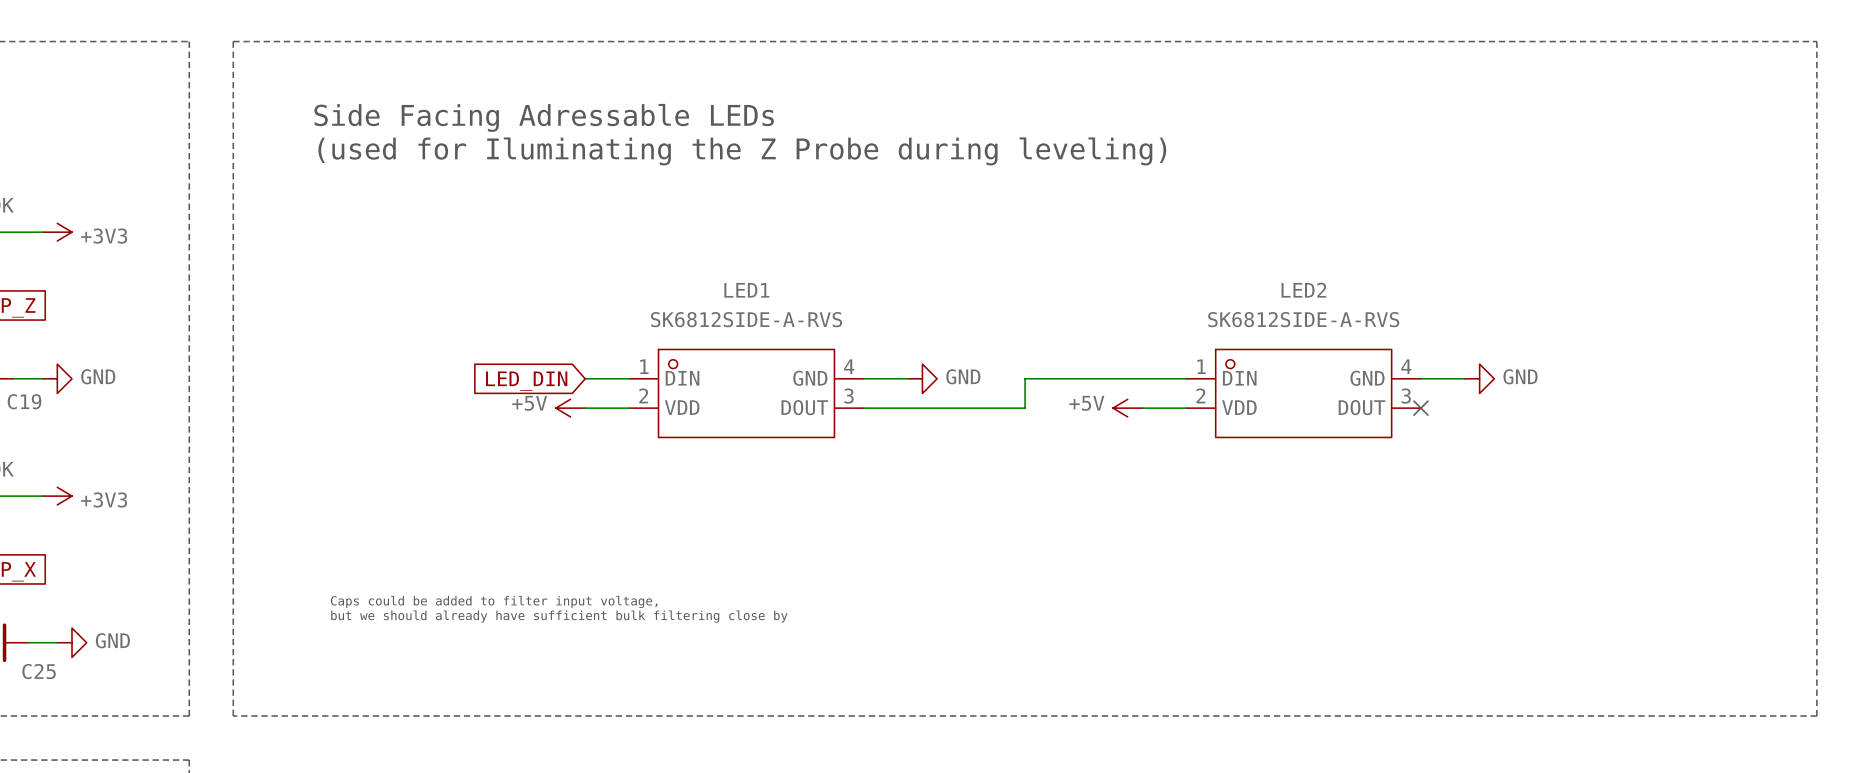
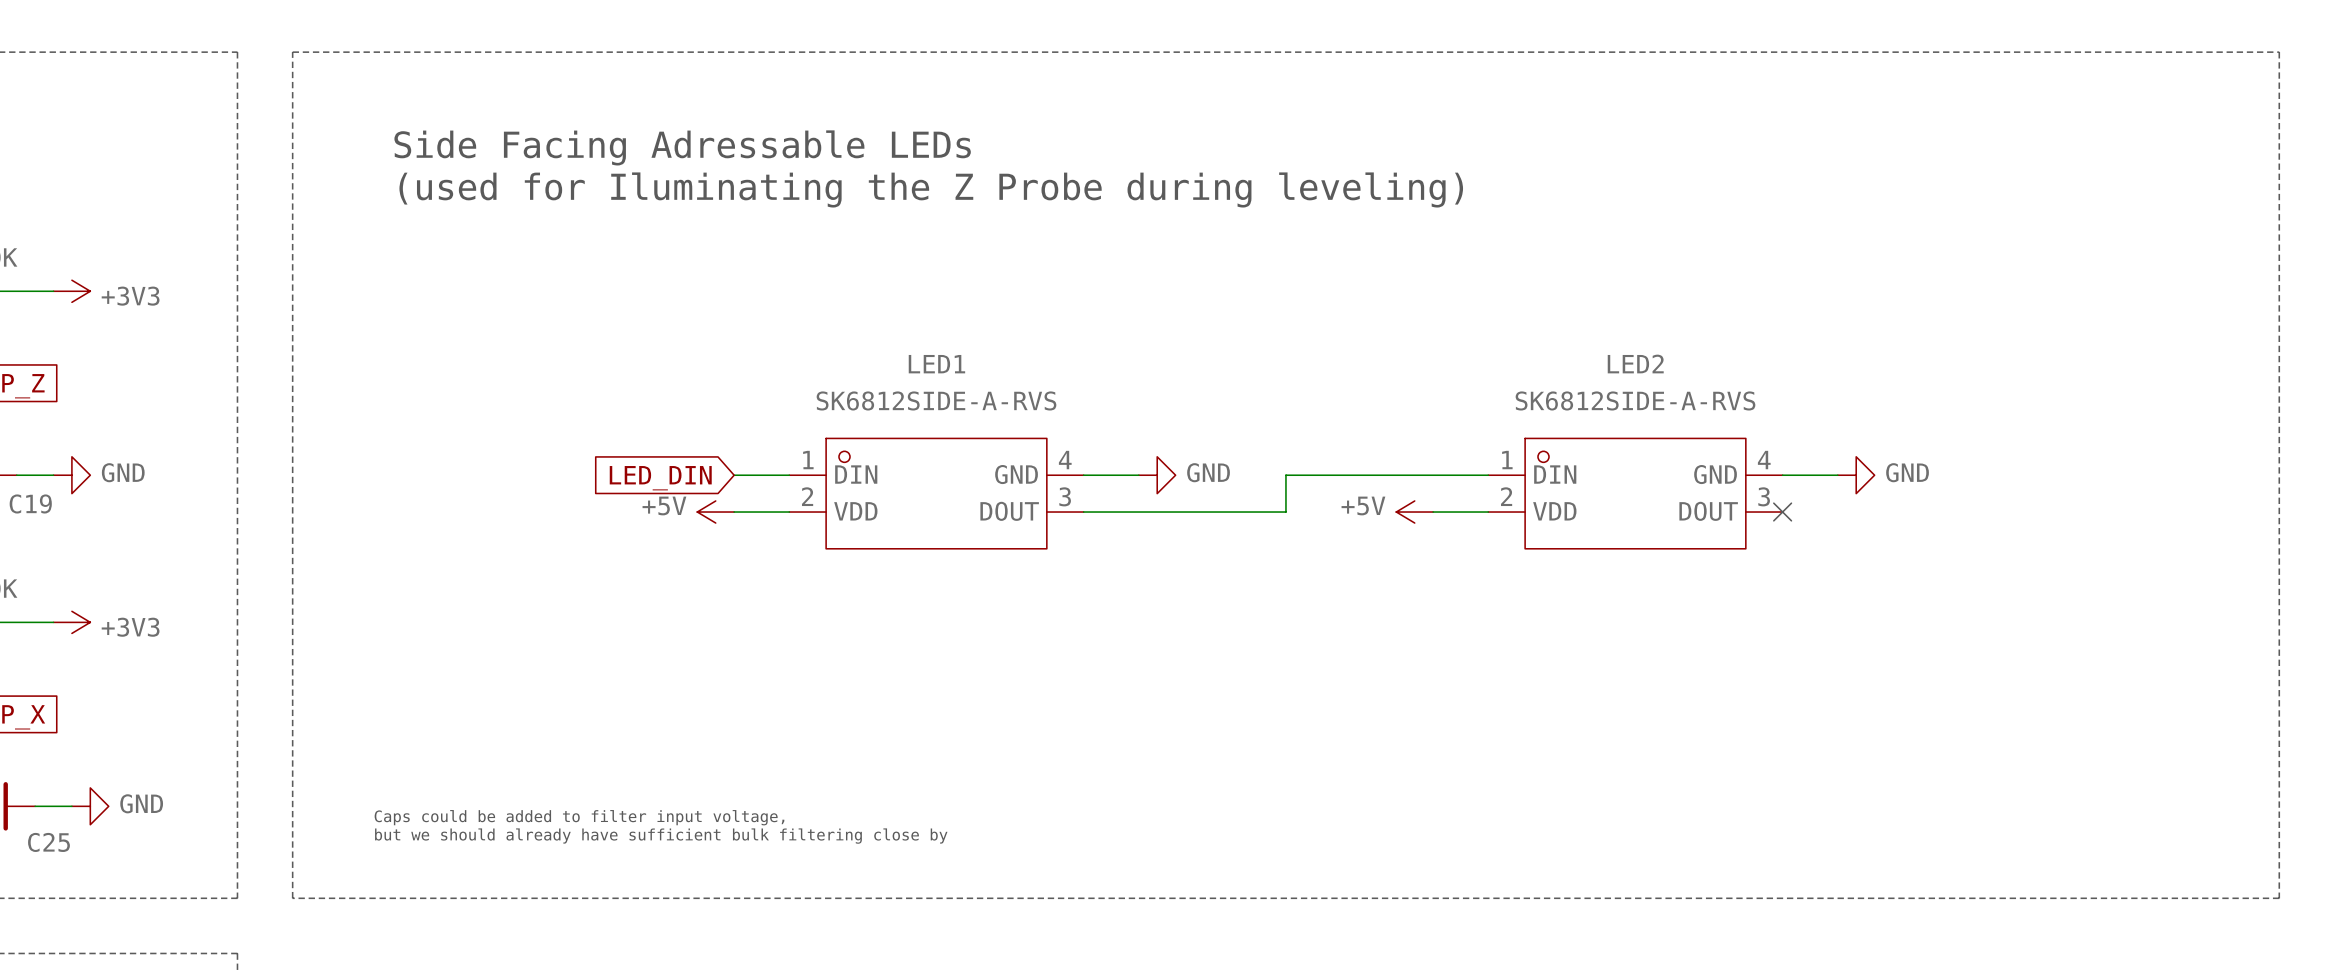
text position: Caps could be added to filter input voltage, (494, 601) -> Caps could be added to filter input voltage, (579, 817)
text position: but we should already have sufficient bulk filtering close by (559, 616) -> but we should already have sufficient bulk filtering close by (661, 836)

